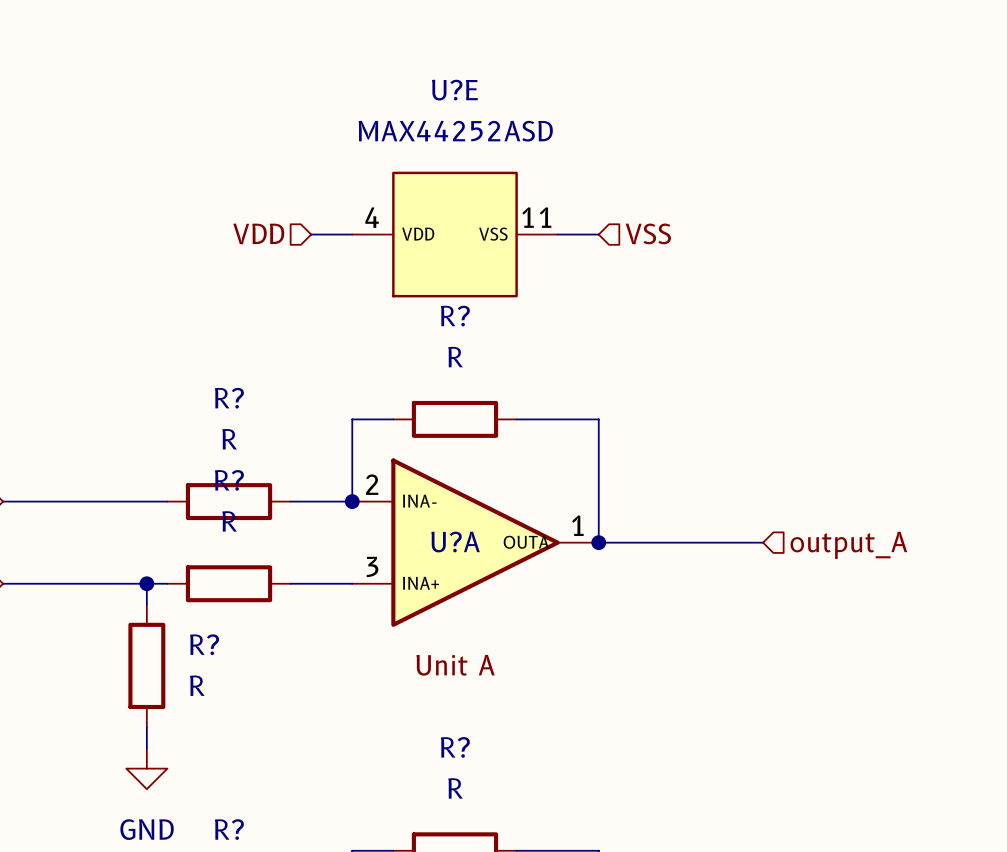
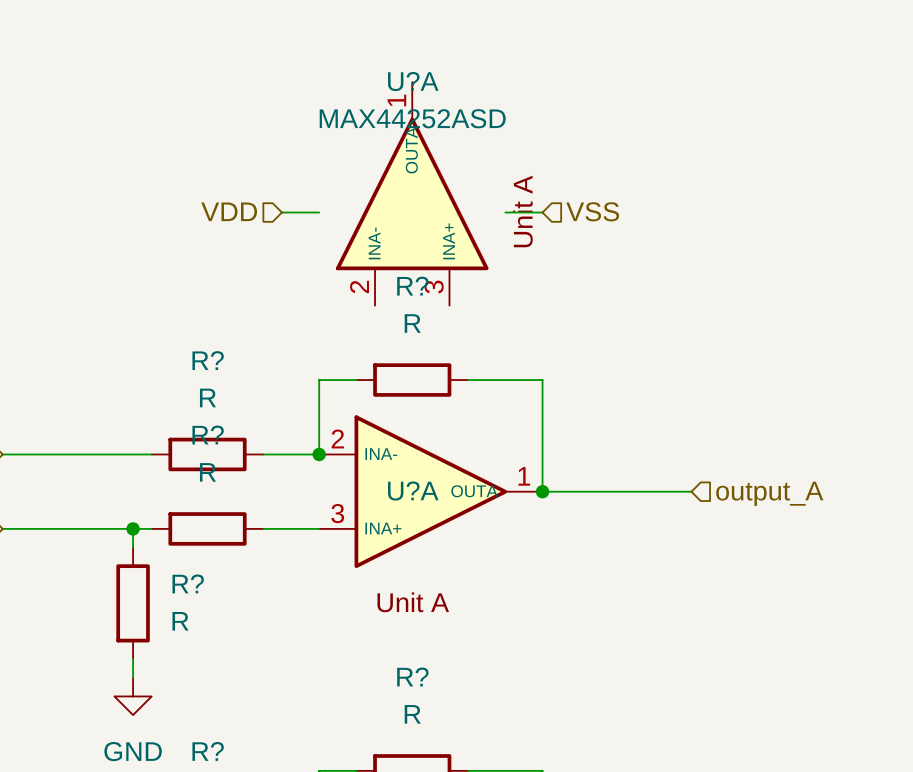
U?A: none -> MAX44252ASD (412, 193)
U?E: MAX44252ASD (454, 234) -> none

